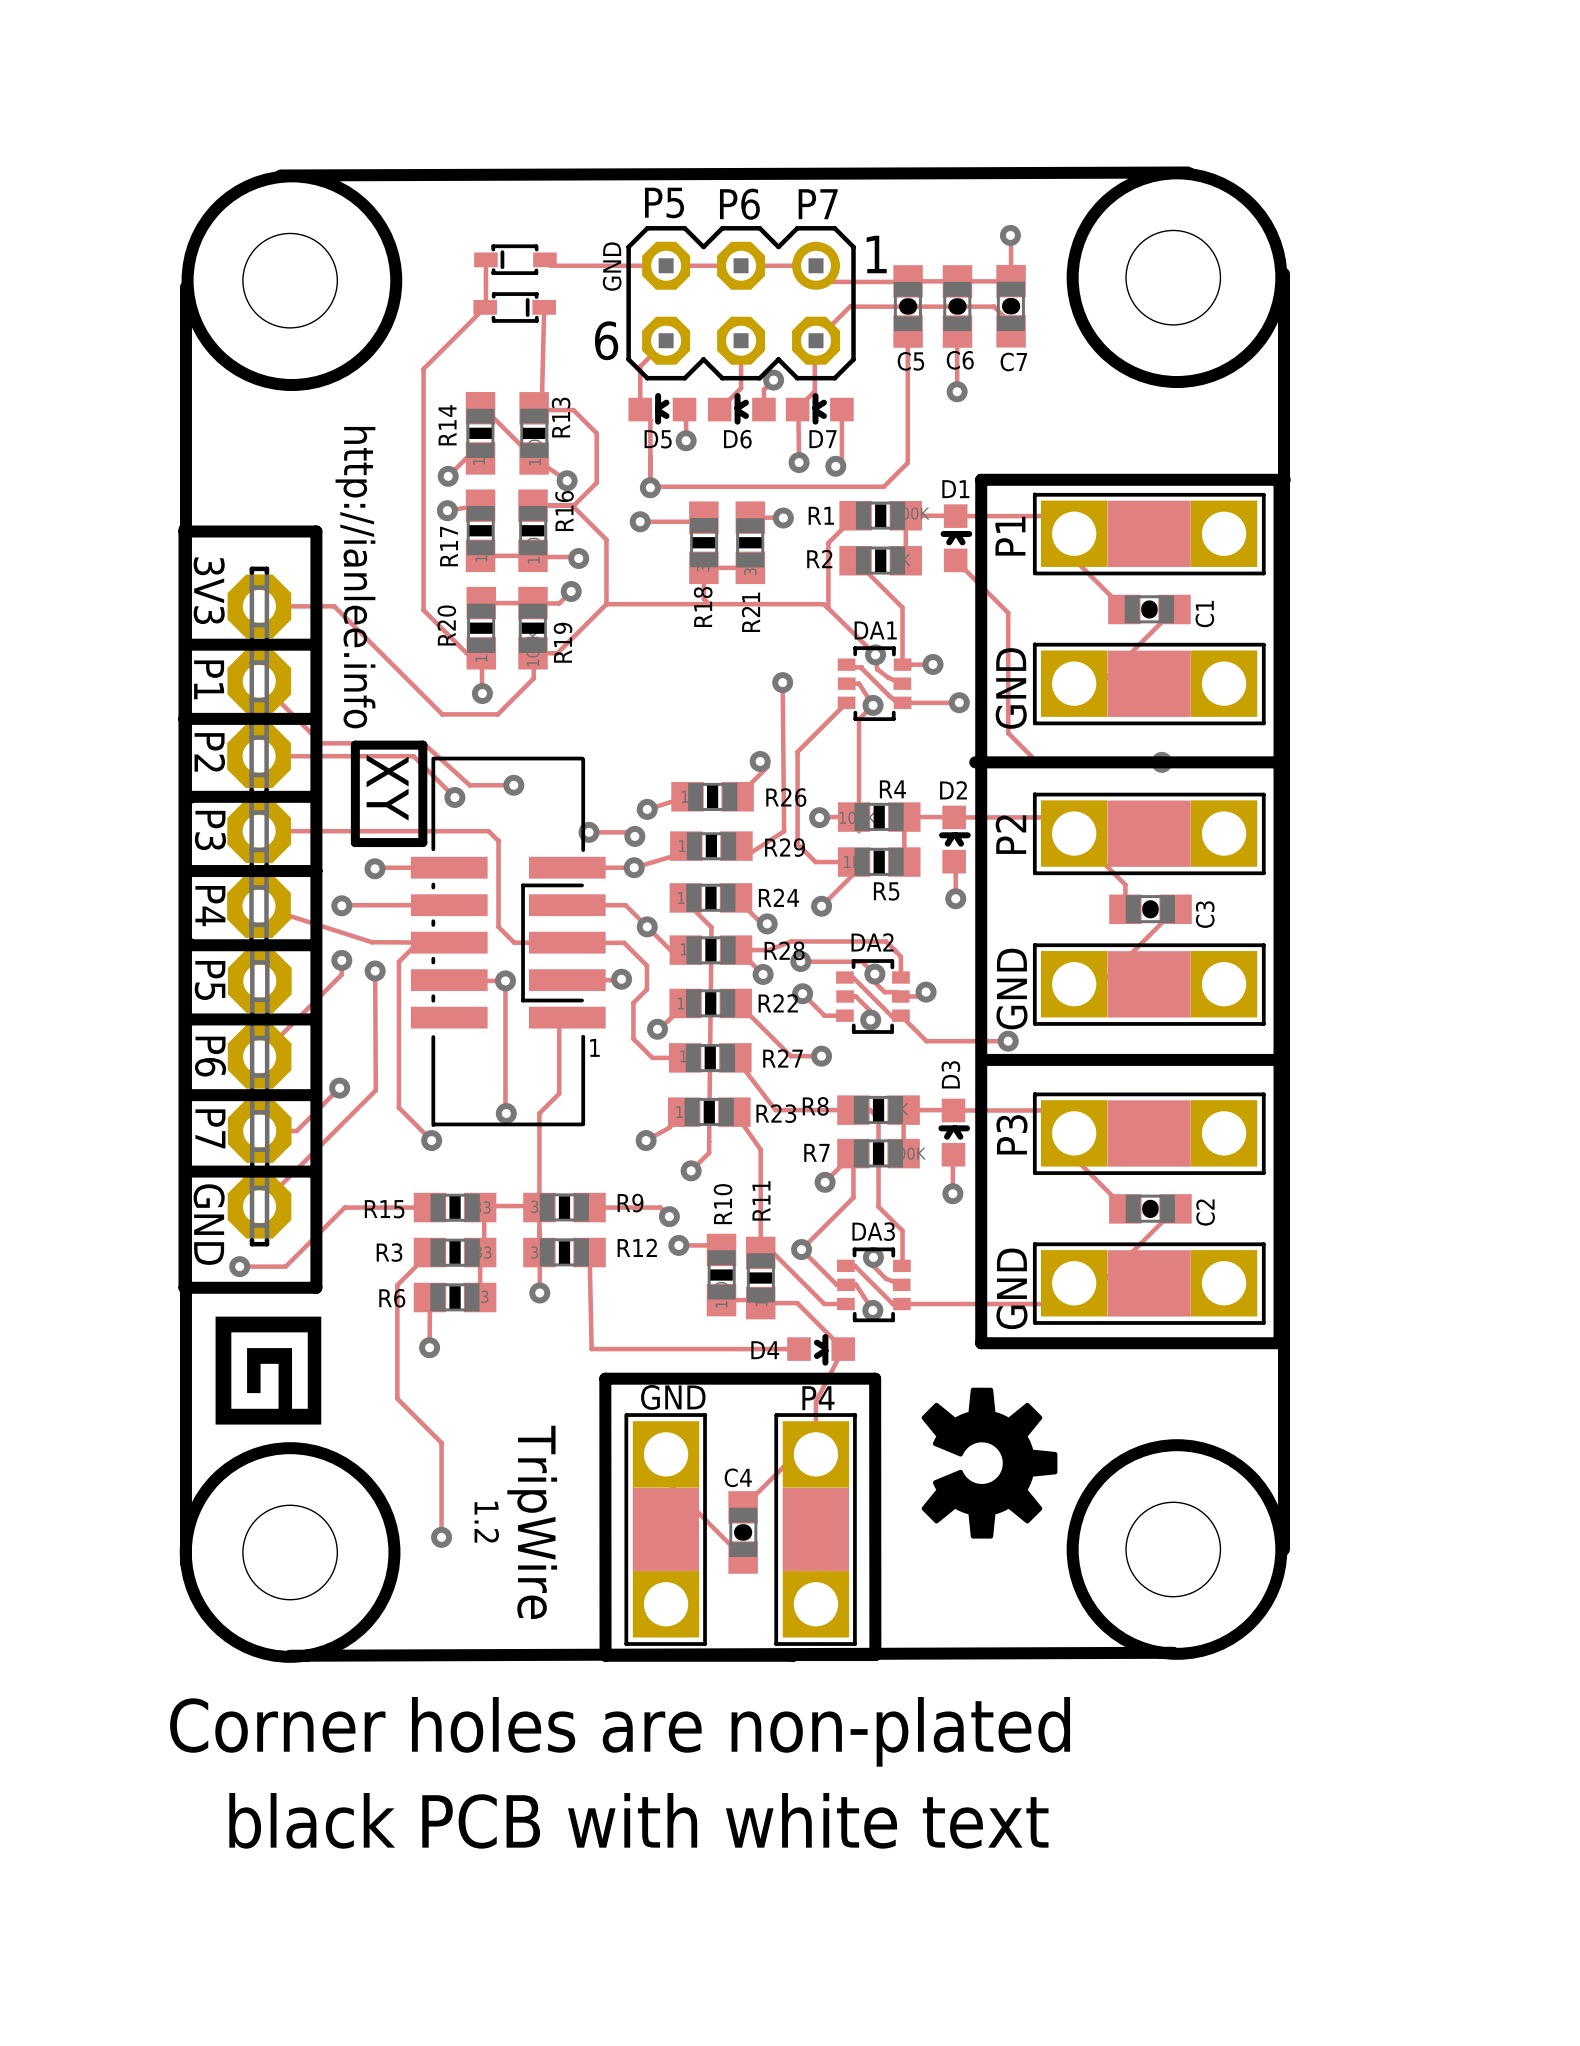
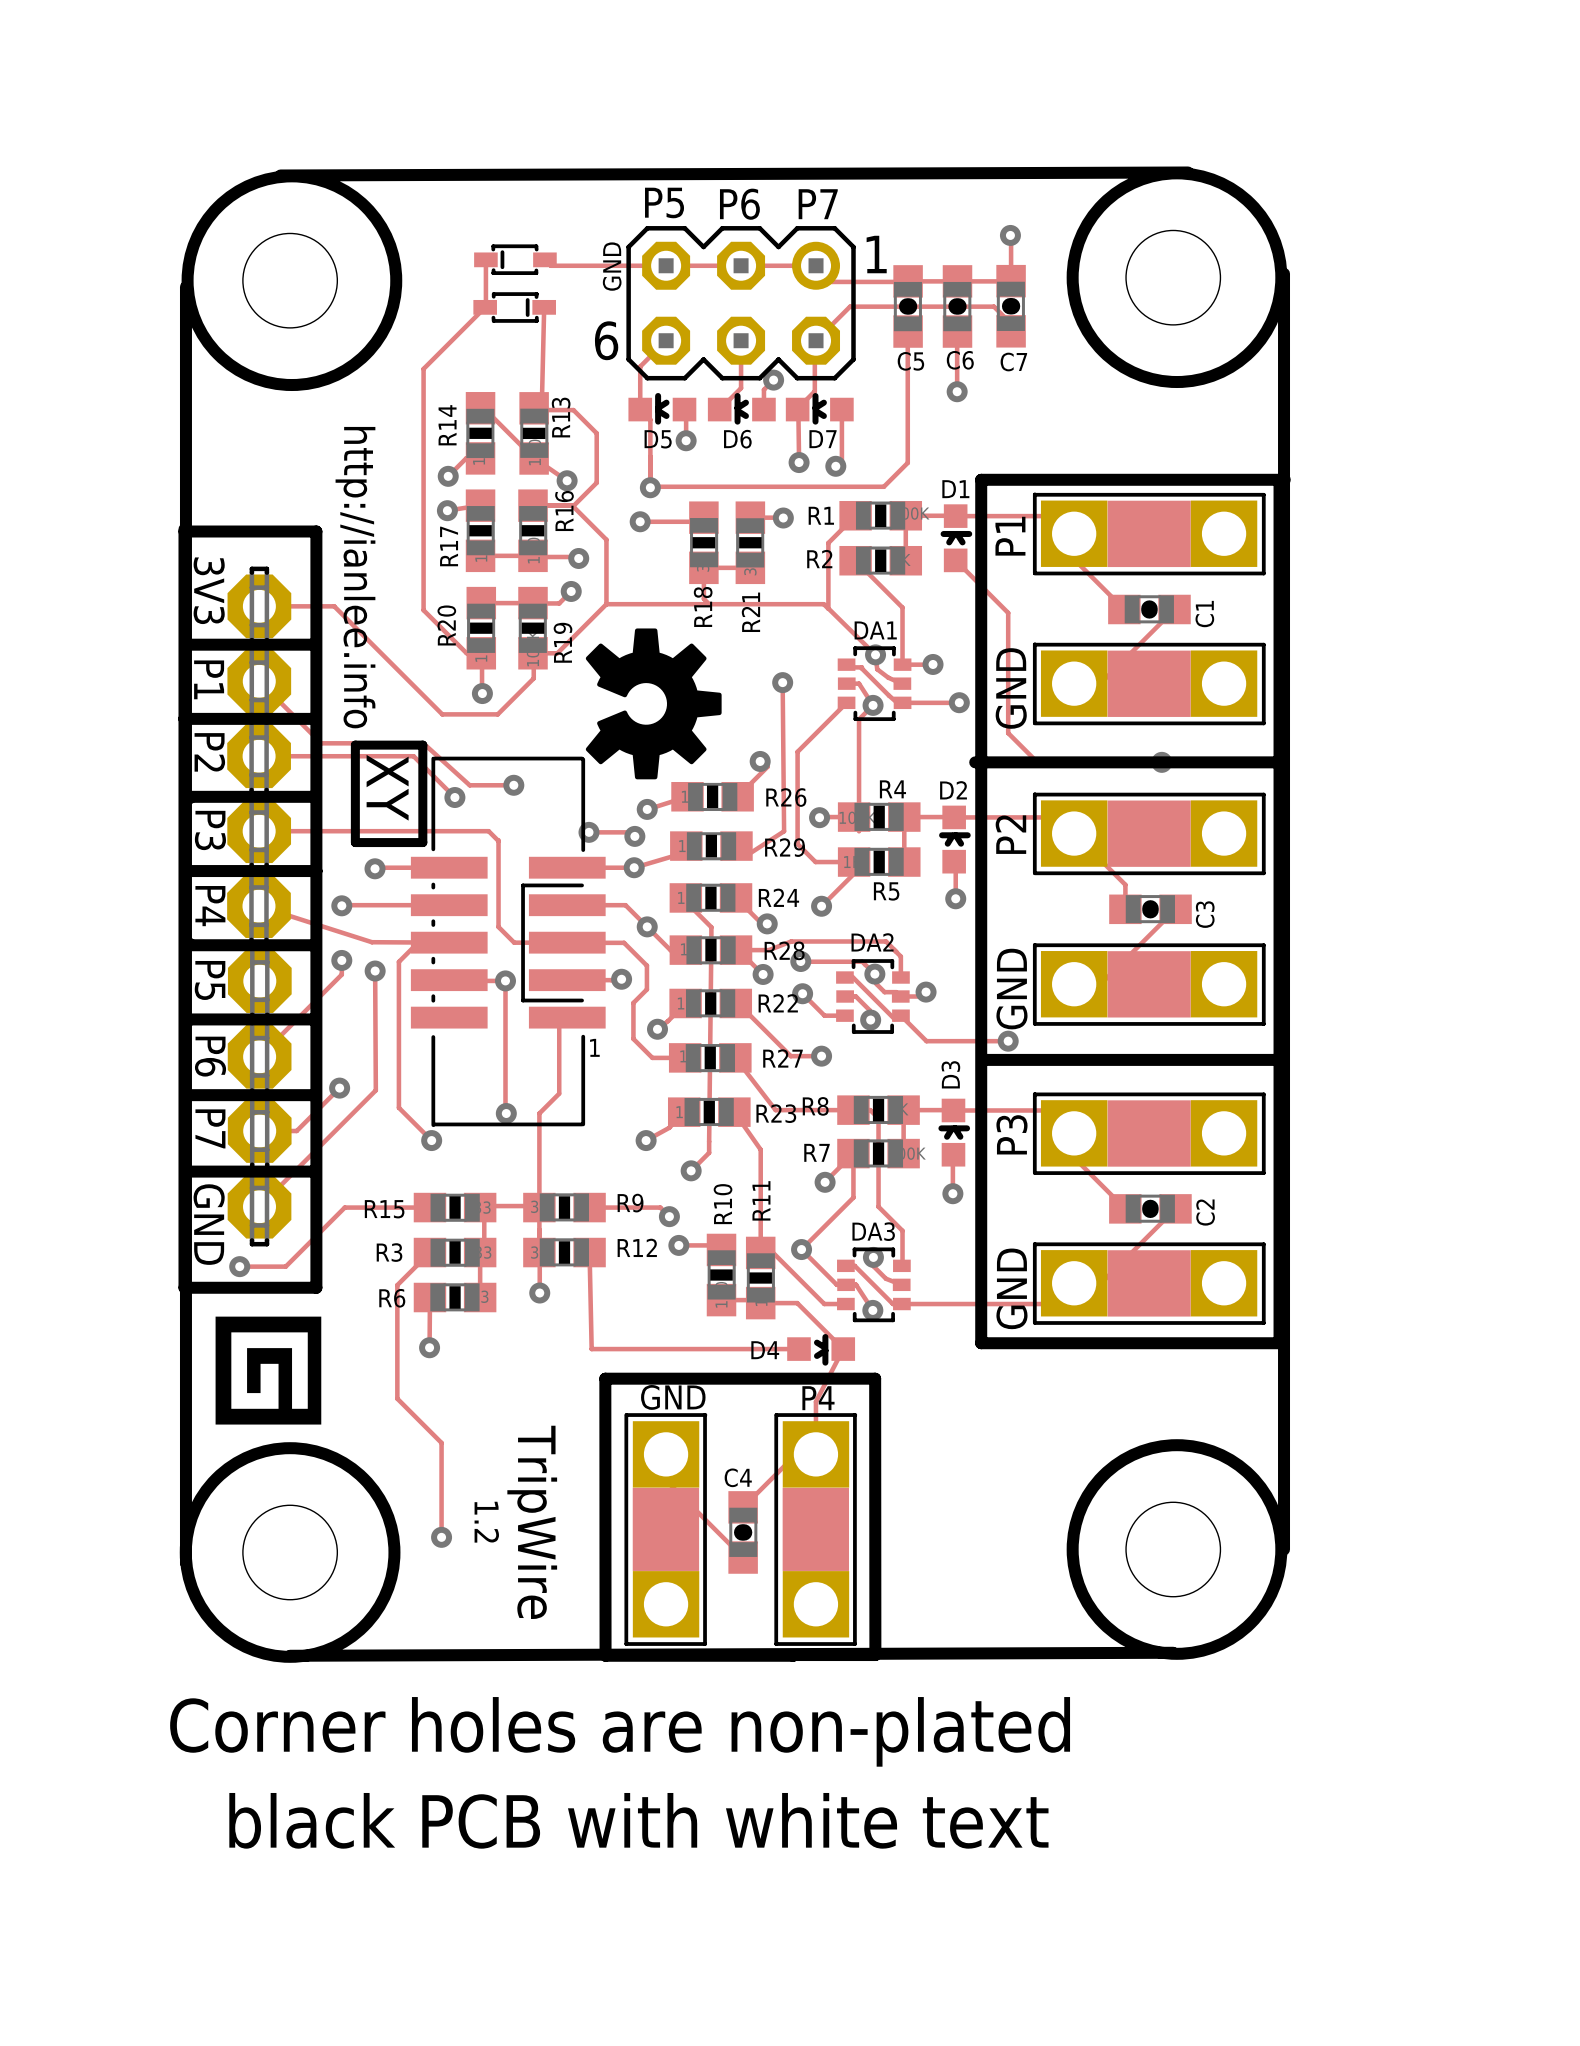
drawing: none -> [585, 628, 722, 780]
drawing: [921, 1387, 1058, 1539] -> none

